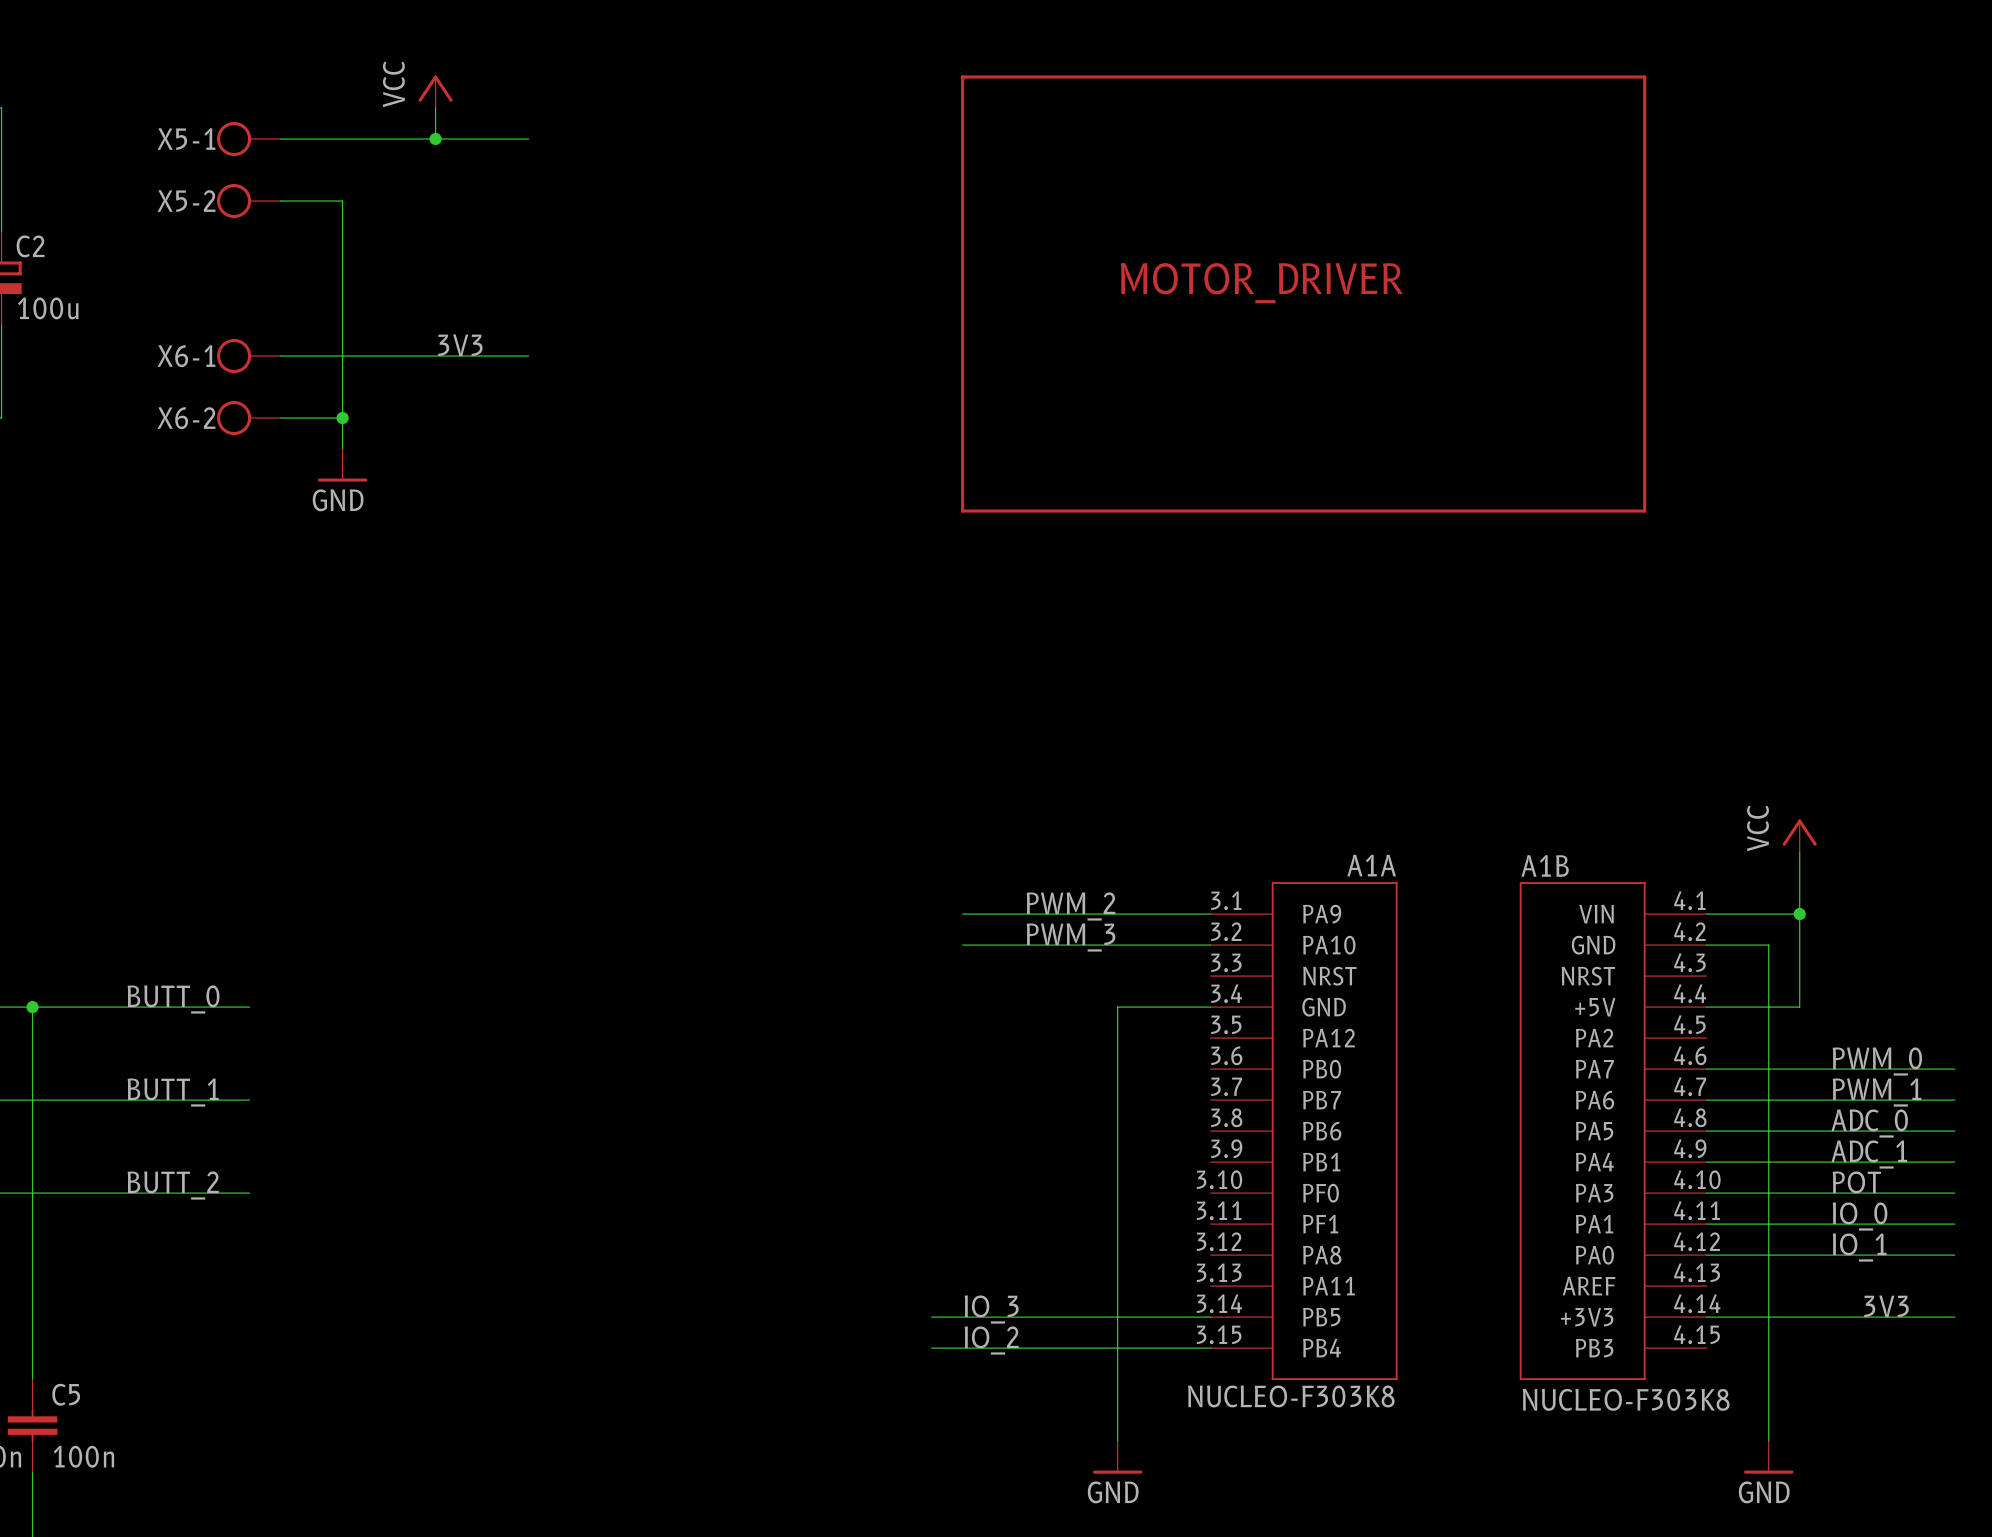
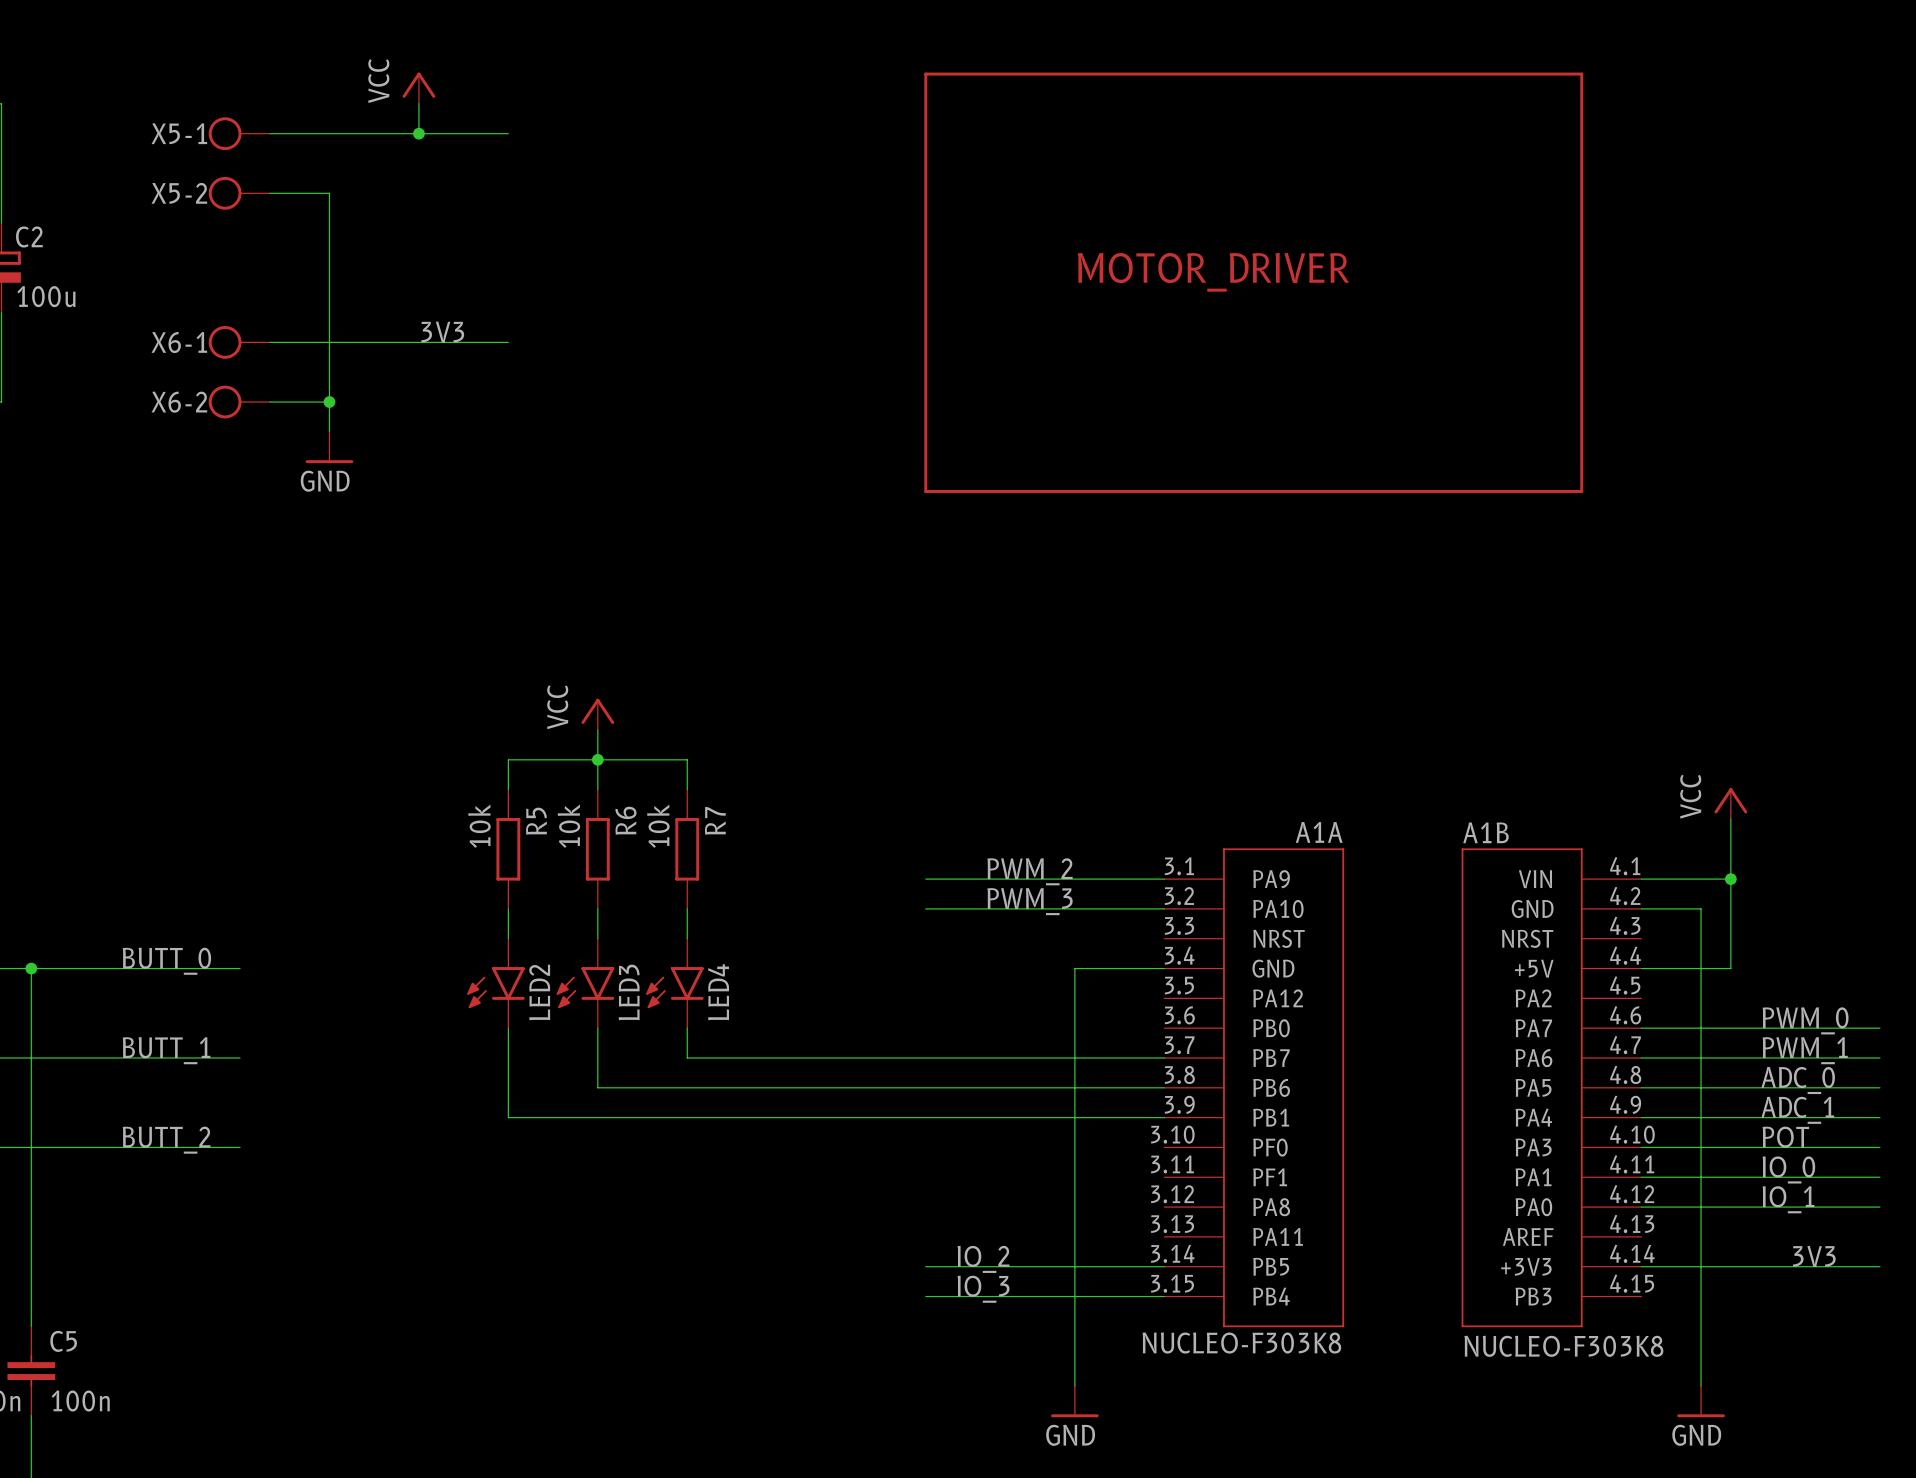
power symbol: none -> VCC (597, 714)
wire: none -> (597, 730) (597, 789)
junction: none -> (597, 759)
wire: none -> (508, 789) (508, 759) (687, 759) (687, 789)
R5: none -> 10k (508, 849)
R6: none -> 10k (597, 849)
R7: none -> 10k (687, 849)
wire: none -> (508, 908) (508, 938)
wire: none -> (597, 908) (597, 938)
wire: none -> (687, 908) (687, 938)
LED2: none -> (496, 983)
LED3: none -> (585, 983)
LED4: none -> (674, 983)
wire: none -> (508, 1028) (508, 1117) (1164, 1117)
wire: none -> (597, 1028) (597, 1087) (1164, 1087)
wire: none -> (687, 1028) (687, 1057) (1164, 1057)
label position: IO_3 (991, 1309) -> IO_3 (983, 1289)
wire: (931, 1317) (962, 1317) -> none
label position: IO_2 (991, 1340) -> IO_2 (983, 1259)
wire: (931, 1348) (962, 1348) -> none

